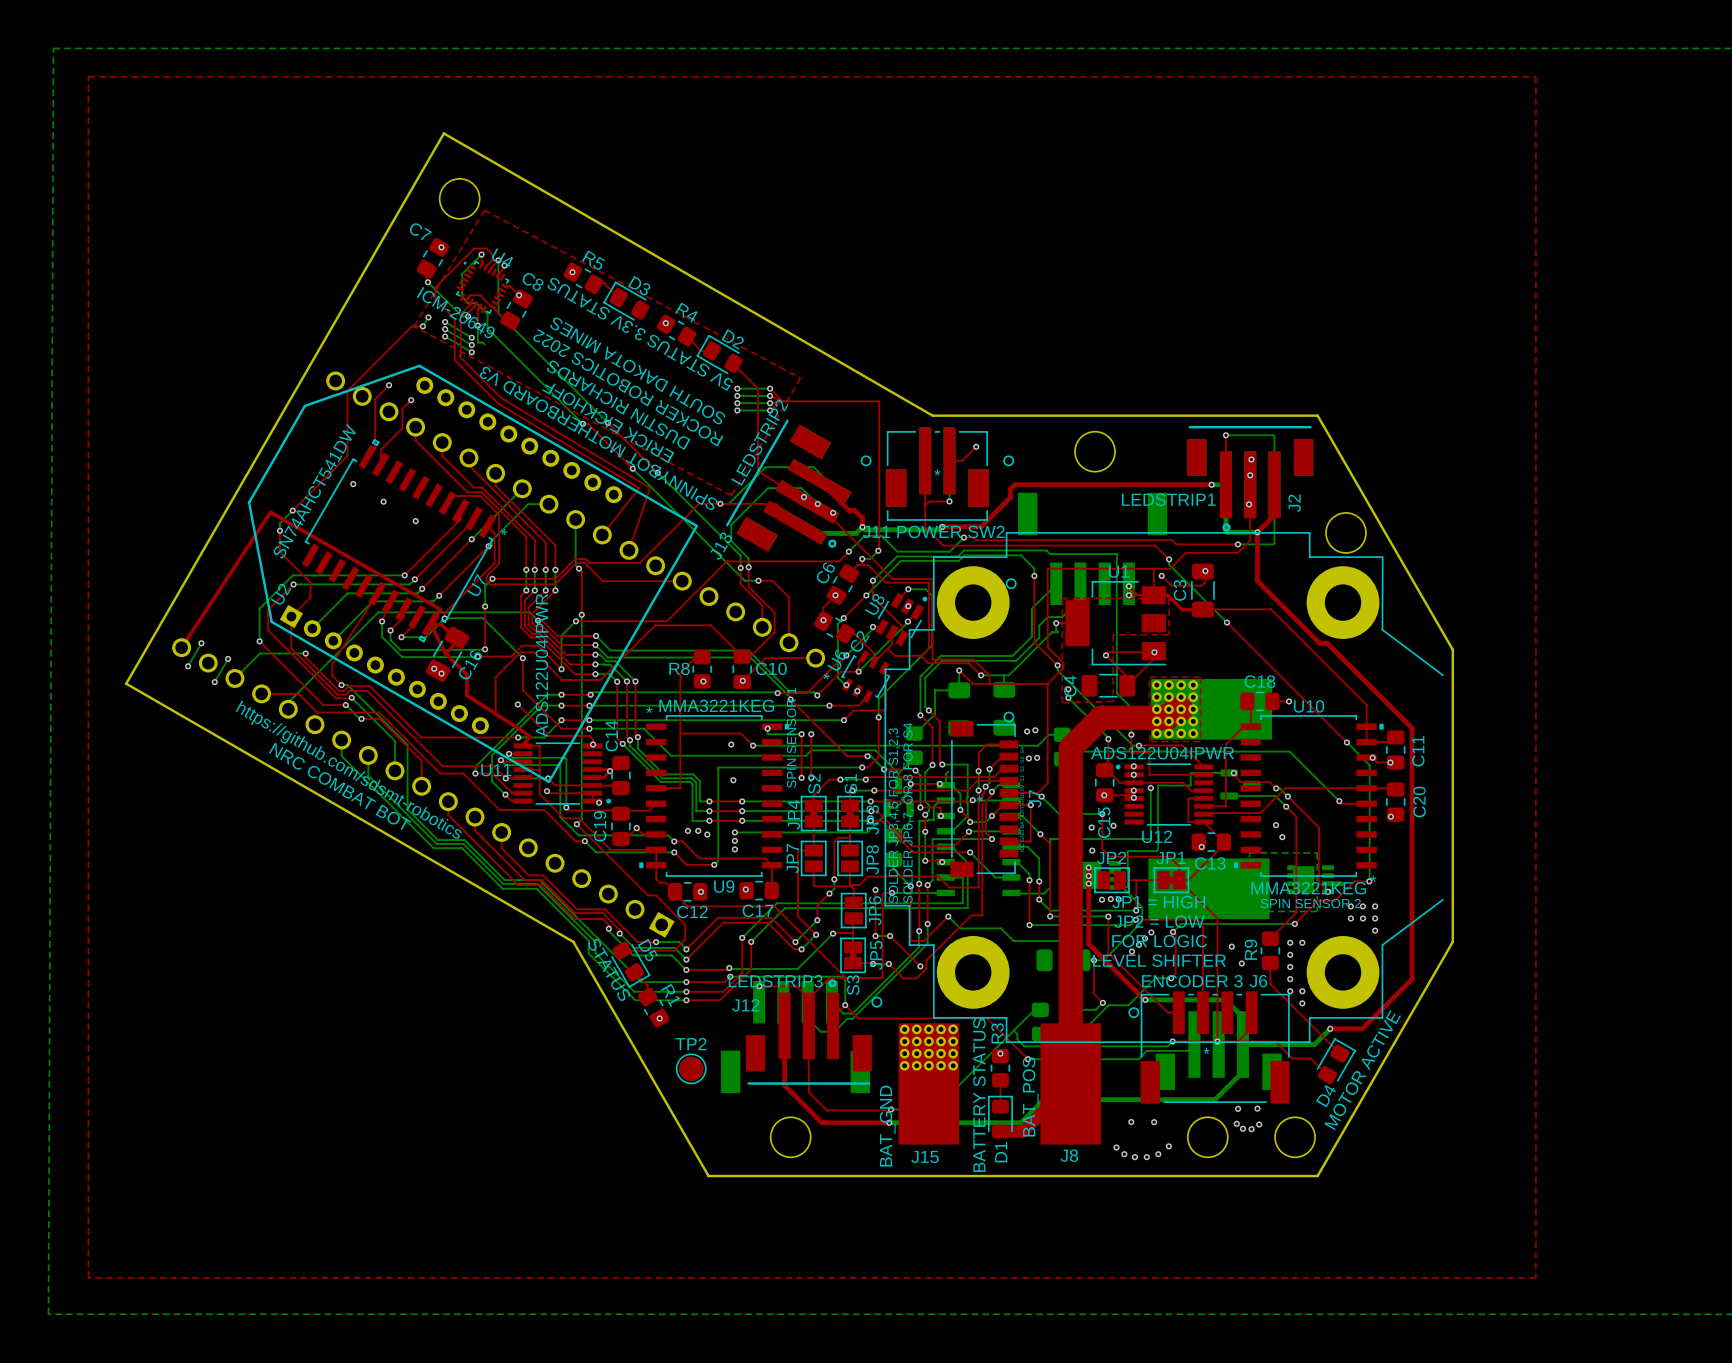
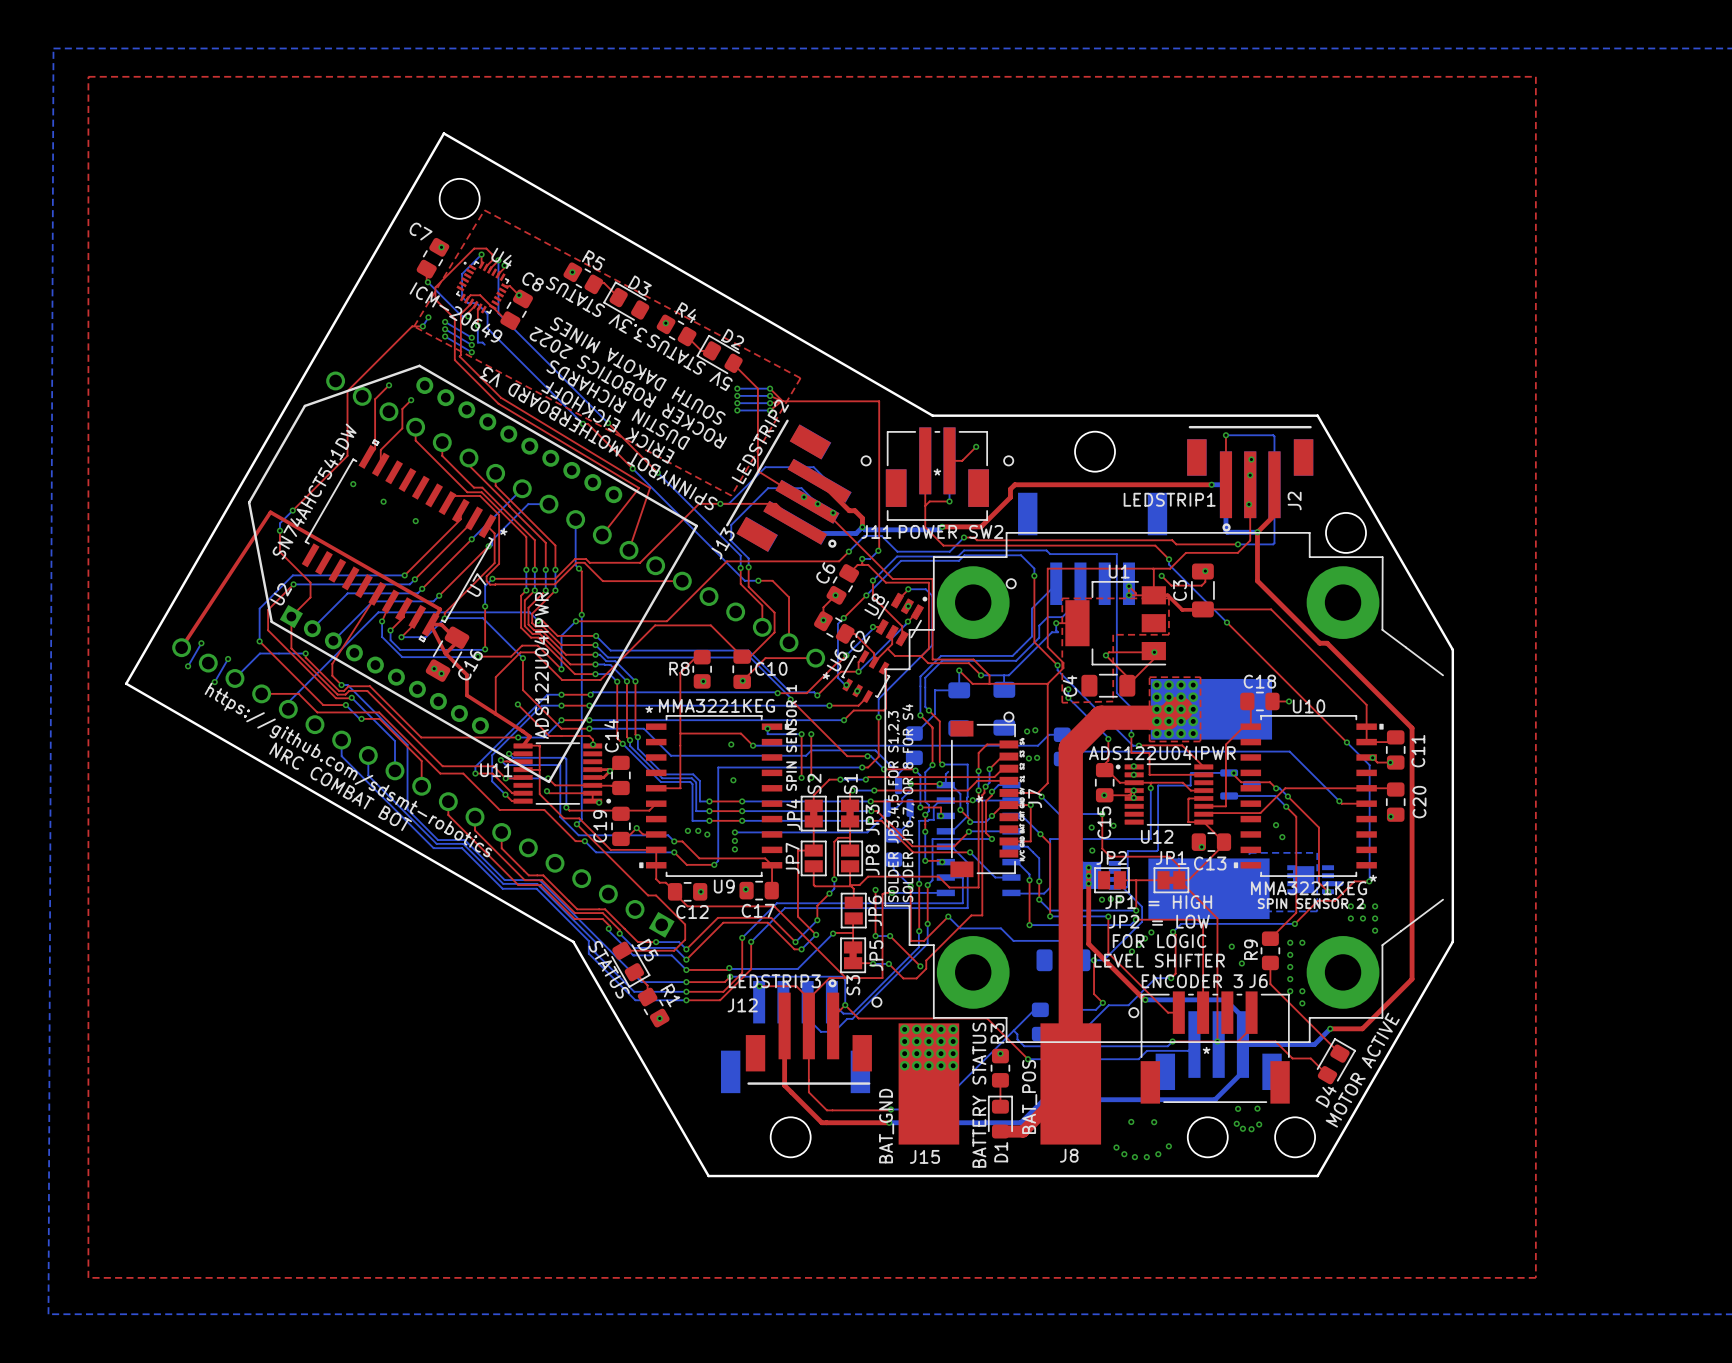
TP2: (691, 1068) -> none

